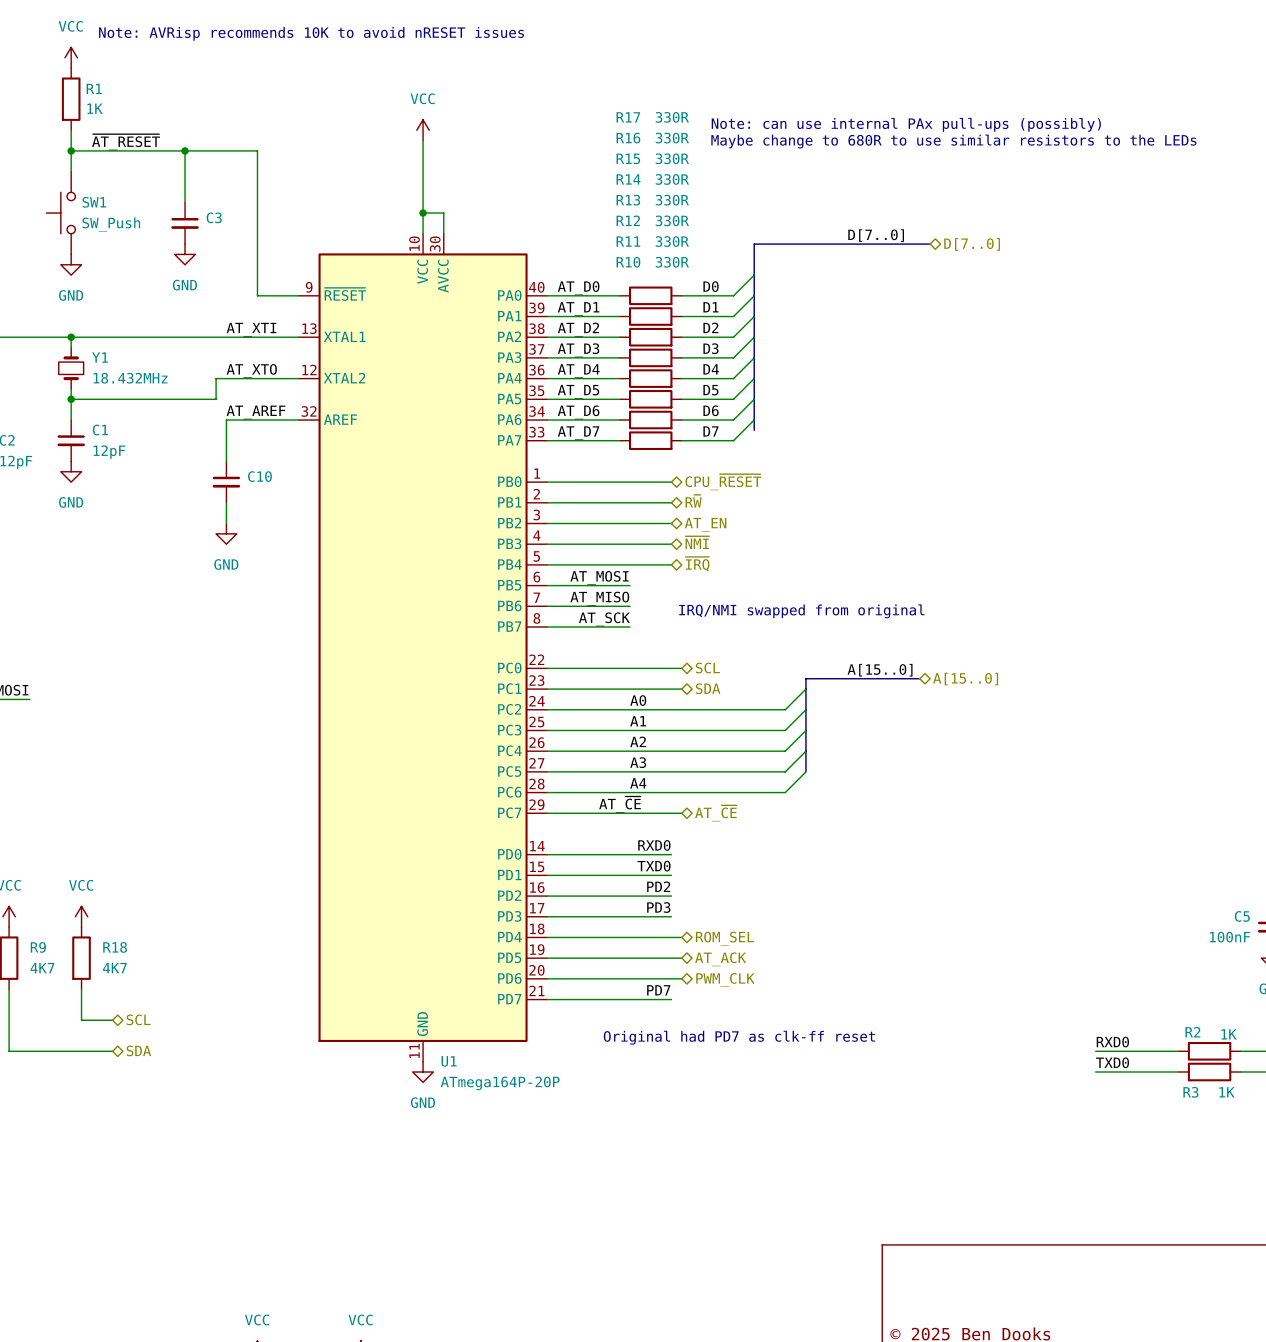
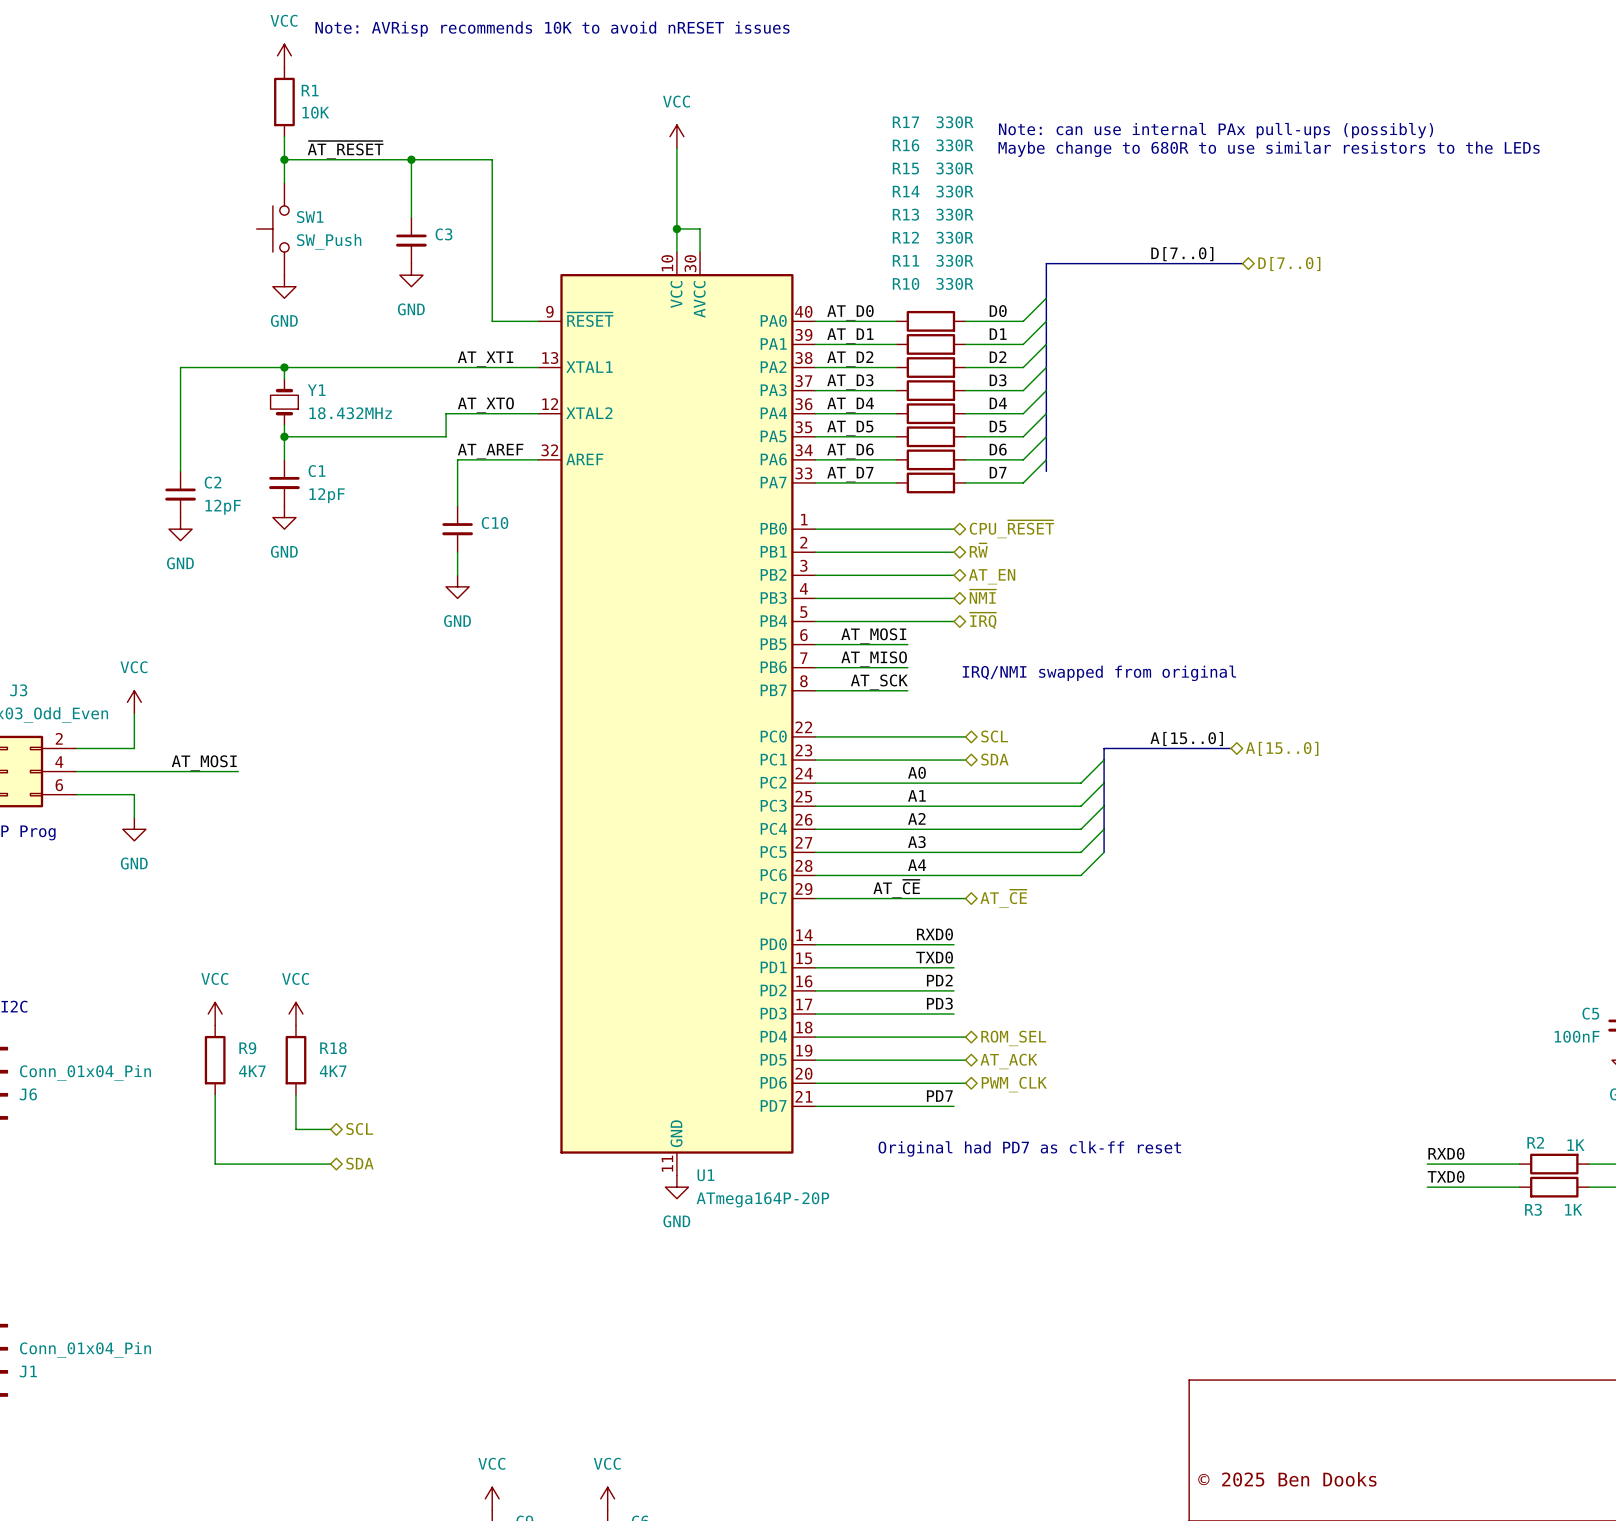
R1 value: 1K (95, 108) -> 10K (315, 112)

